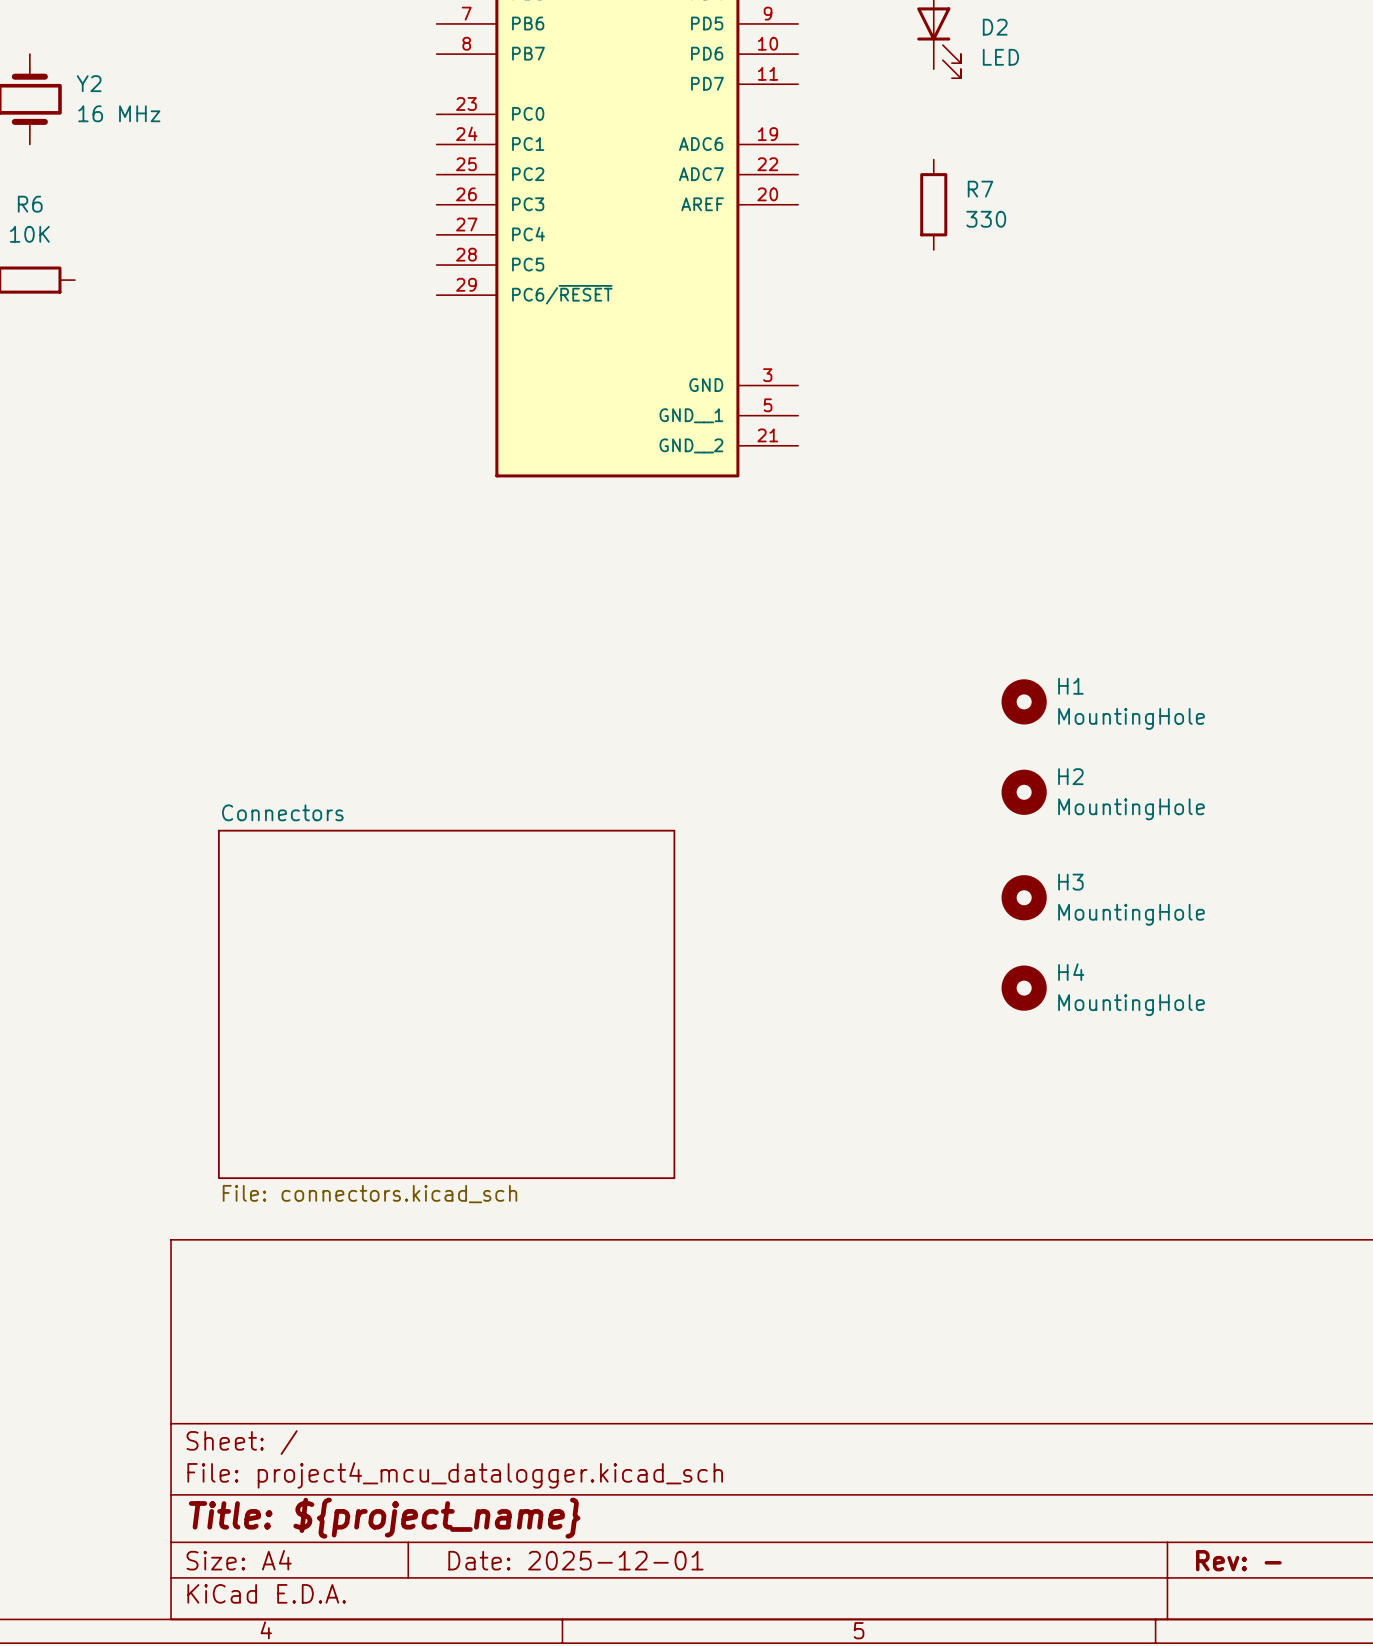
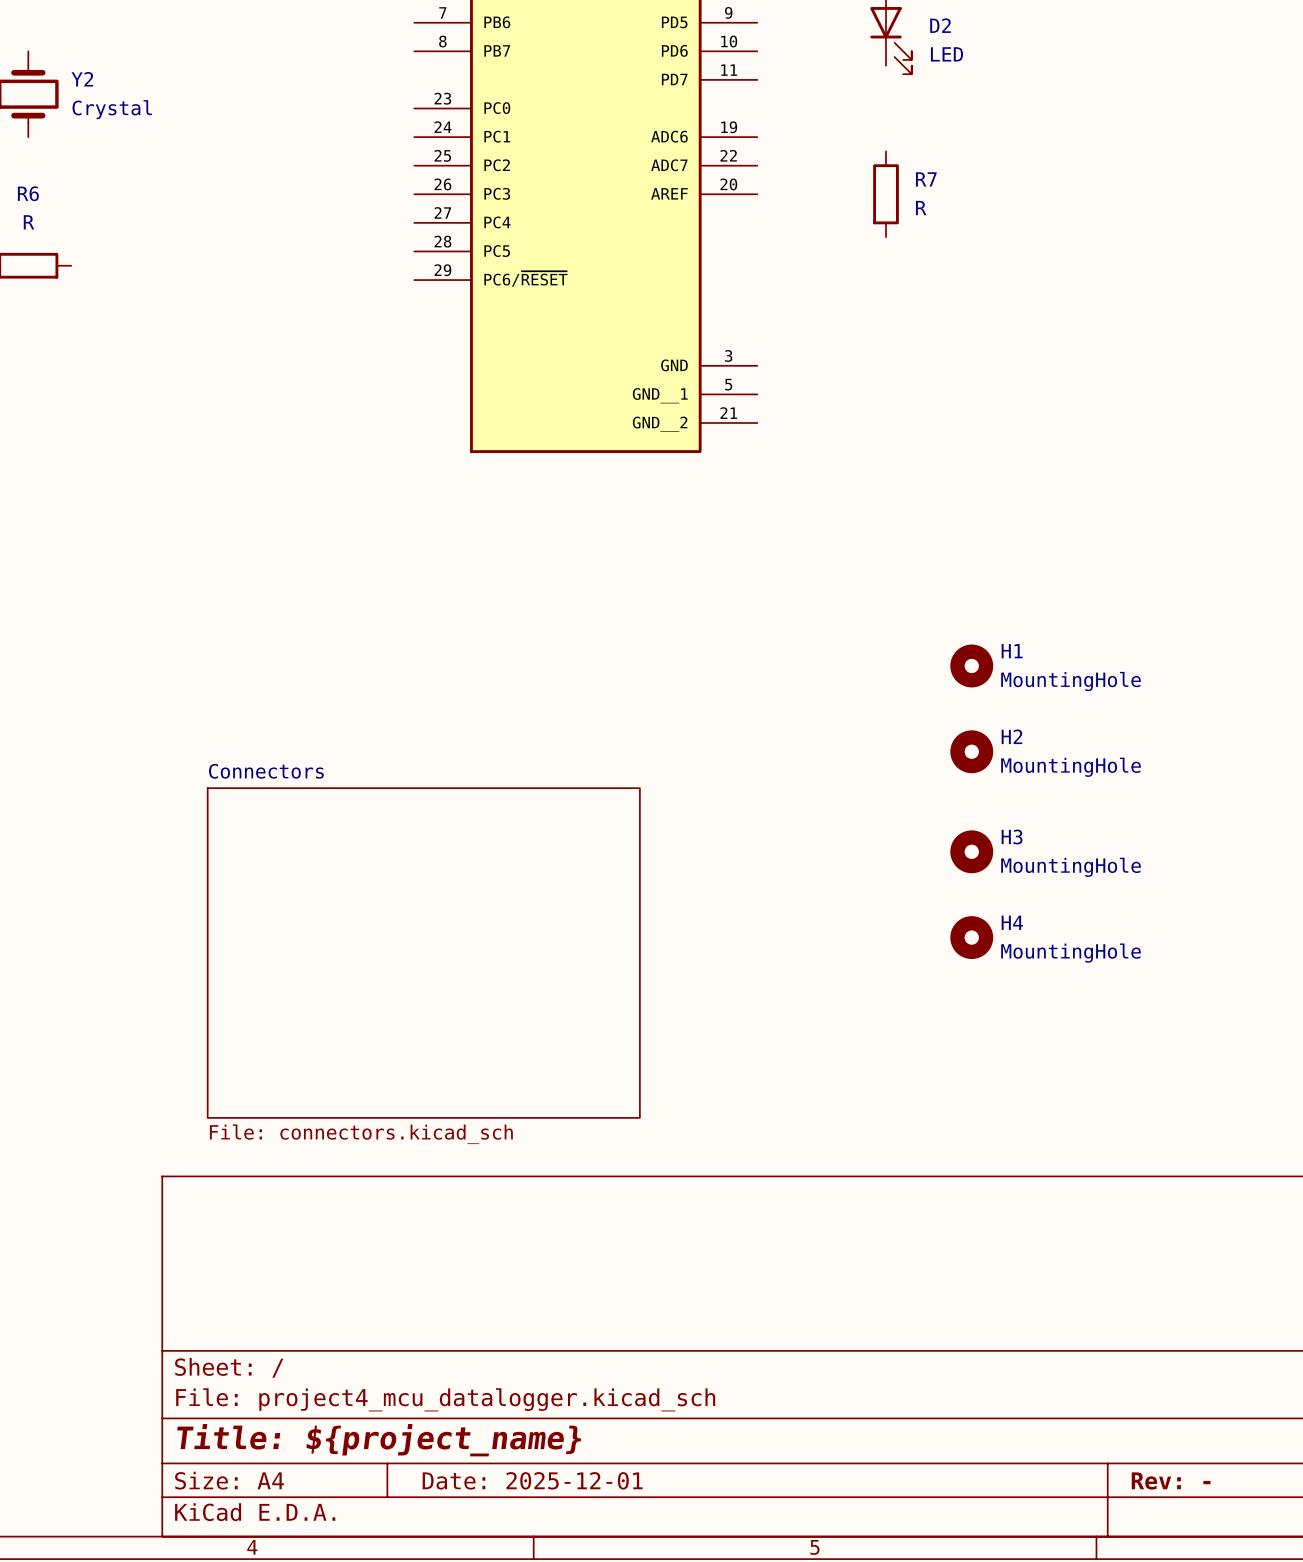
Y2 value: 16 MHz (119, 113) -> Crystal (112, 109)
R7 value: 330 (986, 219) -> R (921, 208)
R6 value: 10K (29, 234) -> R (29, 222)

